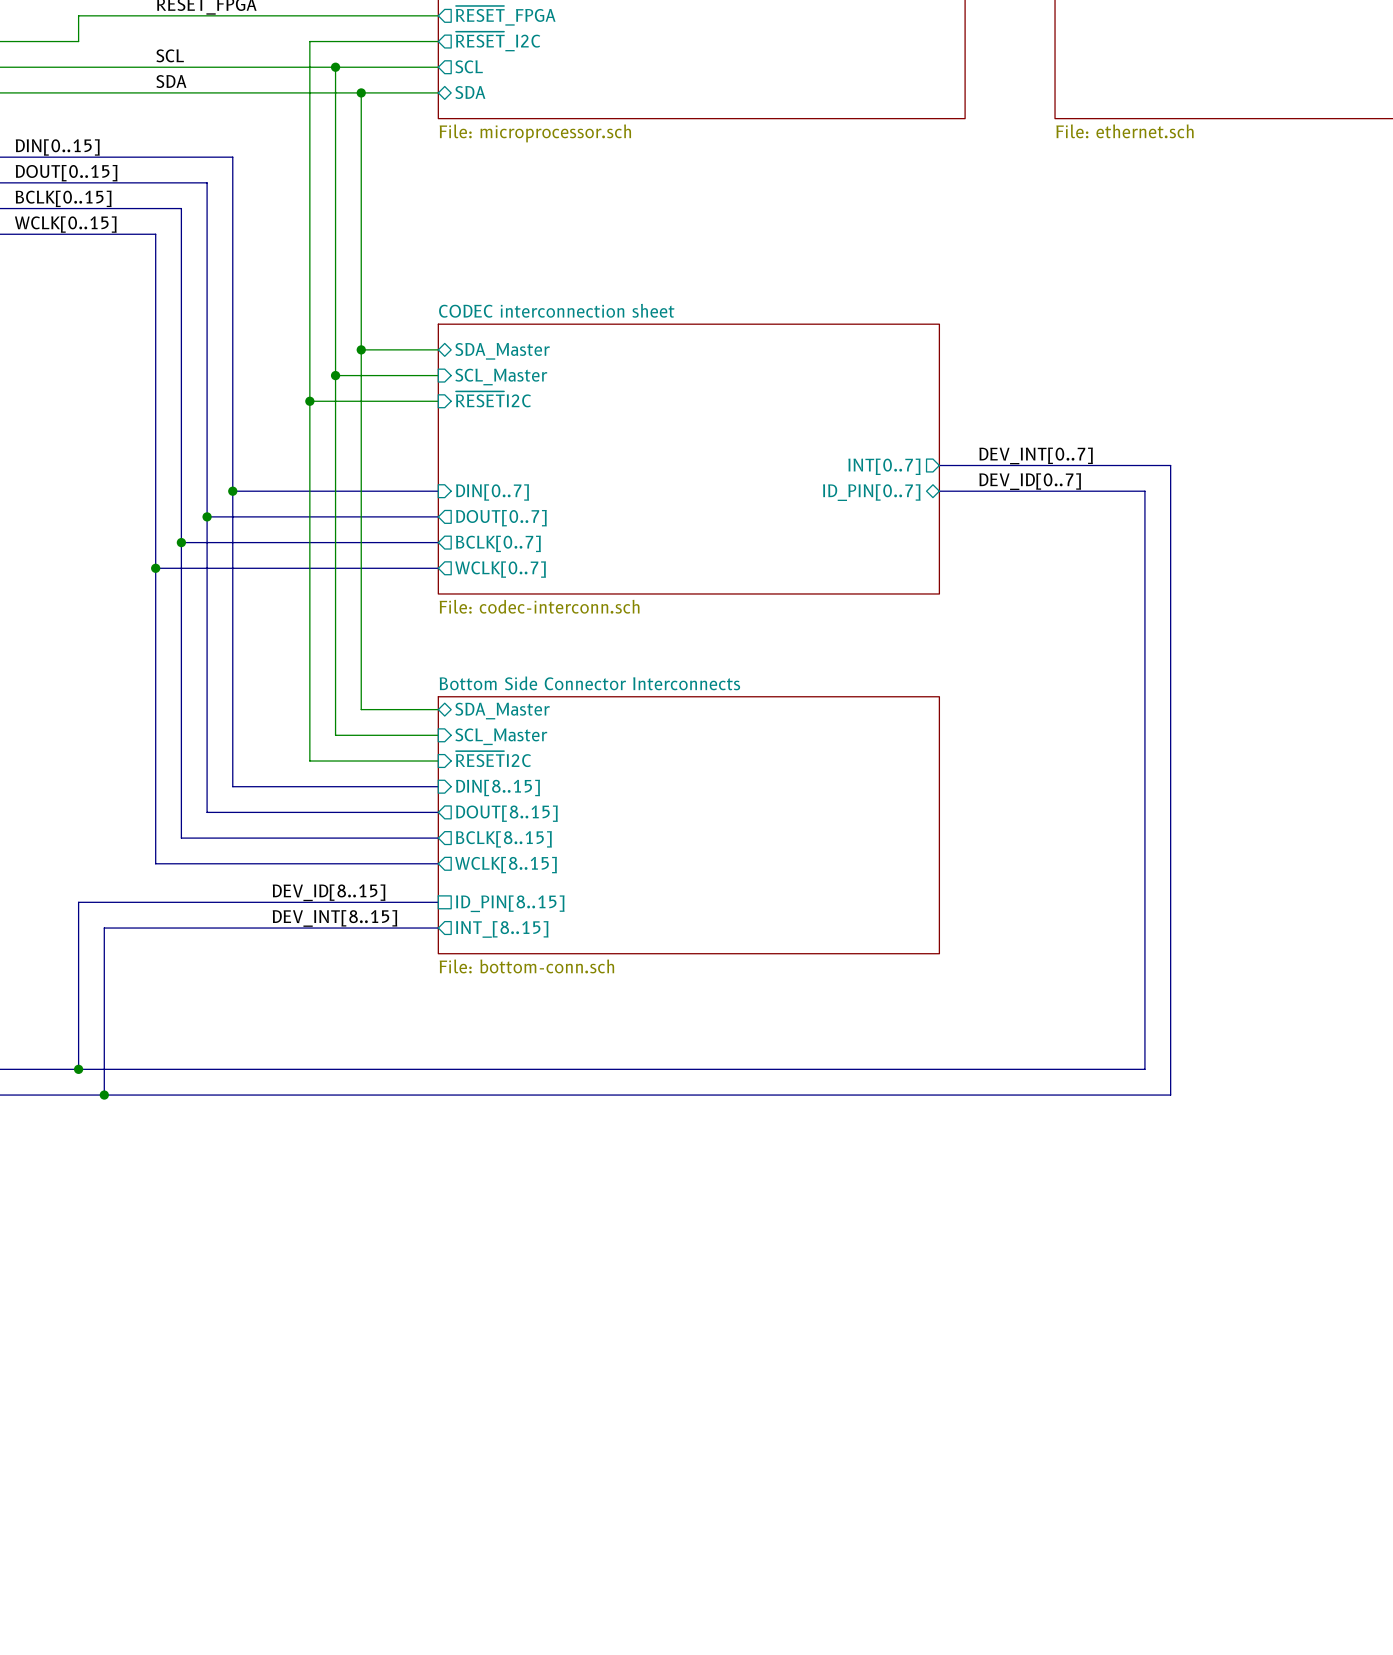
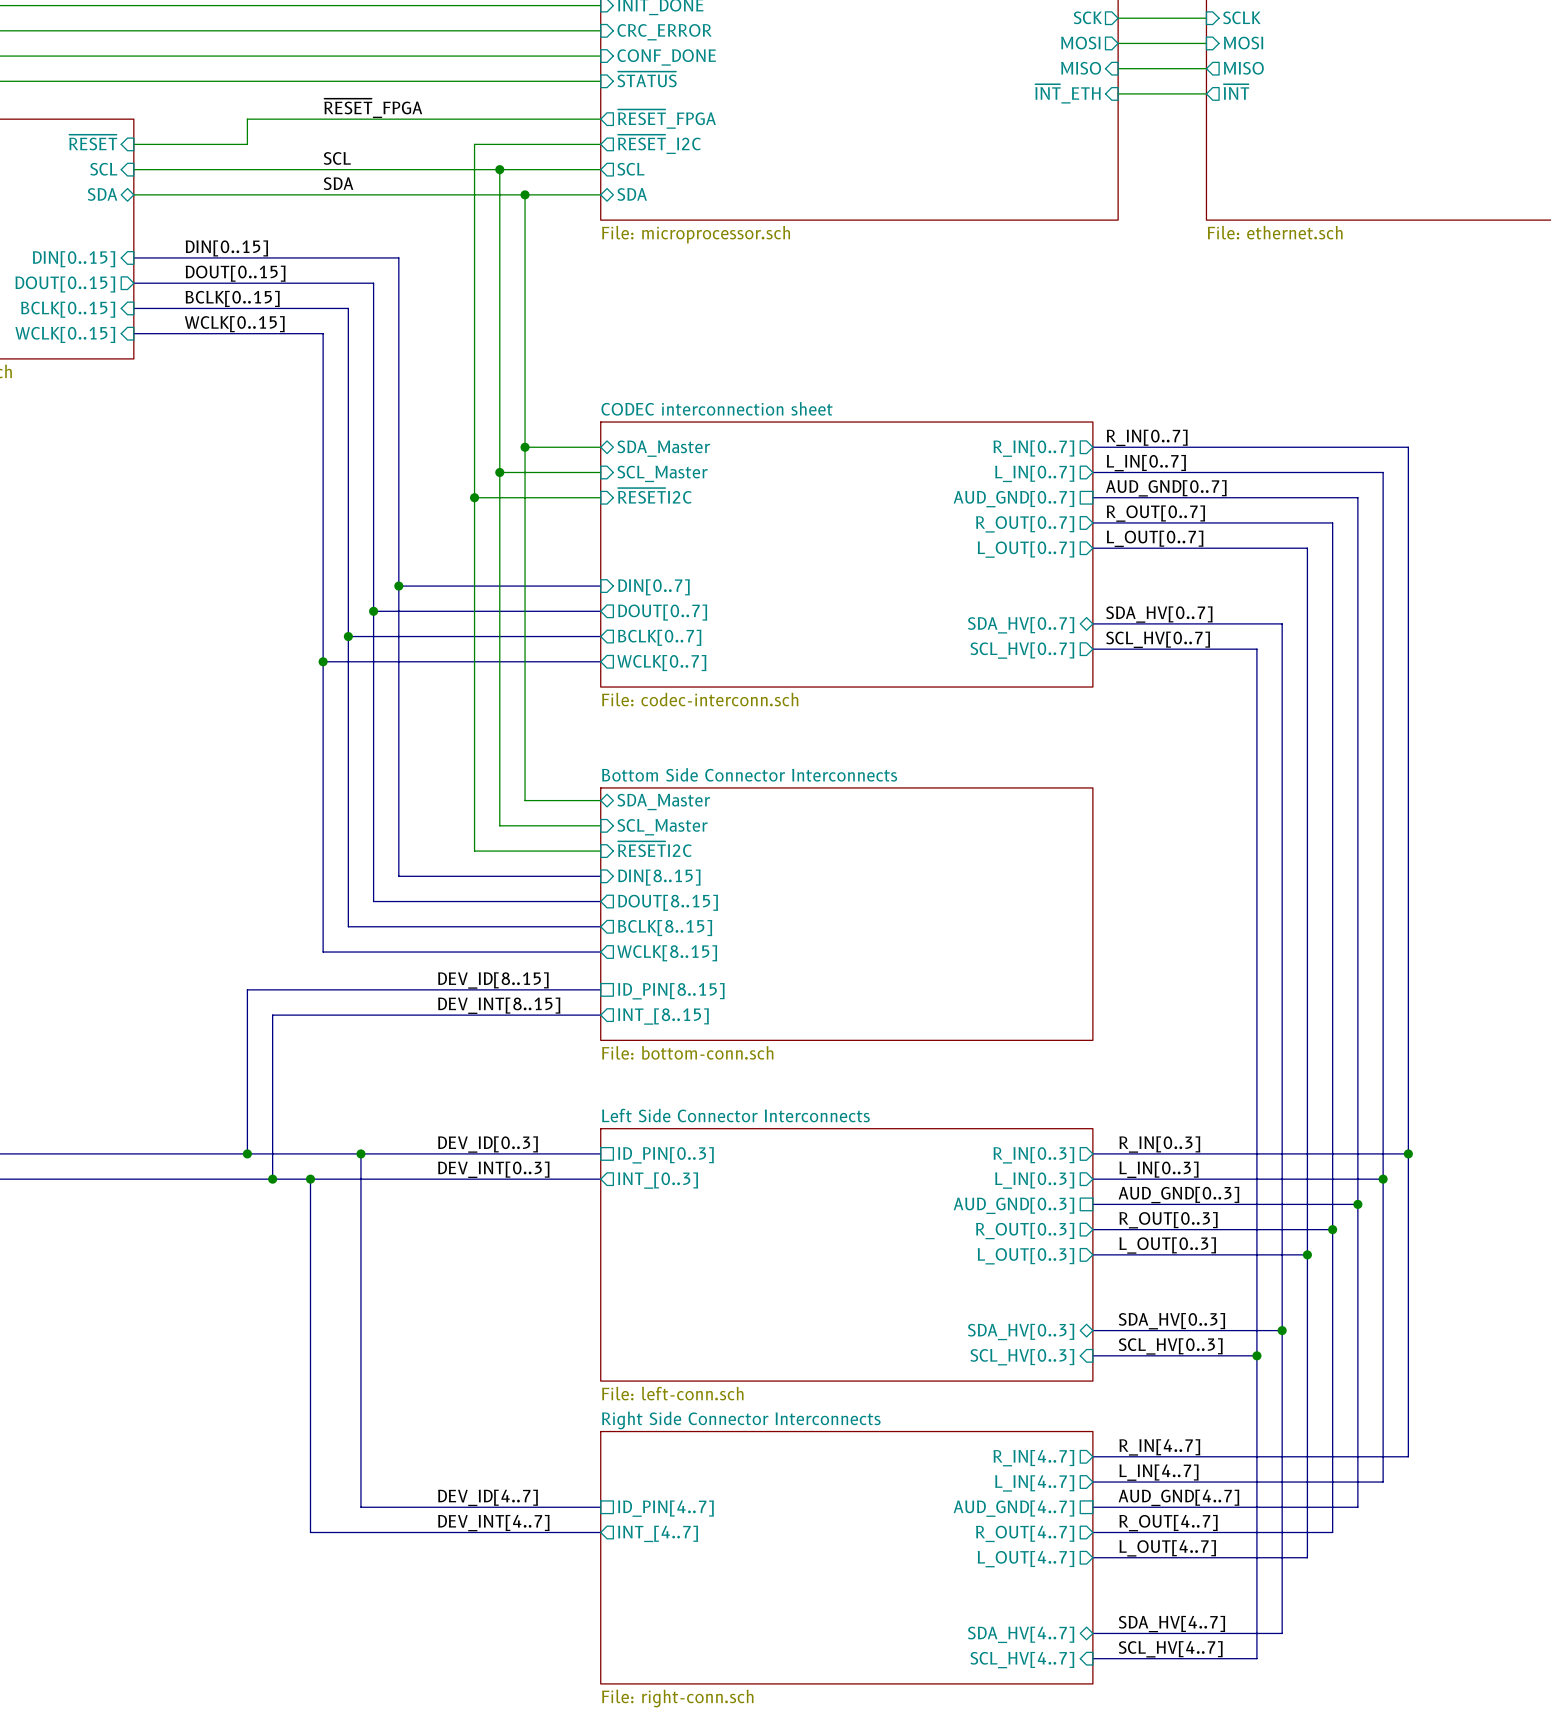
label: none -> R_IN[0..7] (1147, 437)
bus: none -> (1092, 447) (1408, 447) (1408, 1456) (1092, 1456)
sheet pin: none -> R_IN[0..7] (1033, 448)
label: none -> L_IN[0..7] (1146, 463)
bus: none -> (1092, 472) (1383, 472) (1383, 1482) (1092, 1482)
sheet pin: none -> L_IN[0..7] (1034, 473)
label: none -> AUD_GND[0..7] (1166, 488)
bus: none -> (1092, 497) (1357, 497) (1357, 1507) (1092, 1507)
sheet pin: none -> AUD_GND[0..7] (1014, 499)
label: none -> R_OUT[0..7] (1155, 513)
bus: none -> (1092, 522) (1332, 522) (1332, 1532) (1092, 1532)
sheet pin: none -> R_OUT[0..7] (1025, 524)
bus: none -> (1092, 548) (1307, 548) (1307, 1557) (1092, 1557)
label: DEV_INT[0..7] (1036, 455) -> L_OUT[0..7] (1155, 538)
bus: (939, 465) (1170, 465) (1170, 1095) -> (1383, 1179) (1320, 1179)
sheet pin: INT[0..7] (884, 466) -> L_OUT[0..7] (1026, 549)
label: DEV_ID[0..7] (1030, 481) -> none
bus: (939, 491) (1144, 491) (1144, 1069) -> (1408, 1153) (1294, 1153)
sheet pin: ID_PIN[0..7] (871, 492) -> none
label: none -> SDA_HV[0..7] (1159, 614)
bus: none -> (1092, 623) (1282, 623) (1282, 1633) (1092, 1633)
sheet pin: none -> SDA_HV[0..7] (1021, 625)
label: none -> SCL_HV[0..7] (1158, 639)
bus: none -> (1092, 649) (1256, 649) (1256, 1658) (1092, 1658)
sheet pin: none -> SCL_HV[0..7] (1022, 650)
label: none -> DEV_ID[0..3] (488, 1144)
label: none -> R_IN[0..3] (1159, 1144)
bus: none -> (360, 1153) (360, 1507) (600, 1507)
junction: none -> (360, 1153)
bus: (438, 1069) (939, 1069) -> none
junction: none -> (1408, 1153)
sheet pin: none -> ID_PIN[0..3] (665, 1155)
sheet pin: none -> R_IN[0..3] (1033, 1155)
label: none -> DEV_INT[0..3] (493, 1169)
label: none -> L_IN[0..3] (1159, 1169)
bus: none -> (310, 1179) (310, 1532) (600, 1532)
junction: none -> (310, 1179)
bus: (438, 1095) (939, 1095) -> none
junction: none -> (1383, 1179)
sheet pin: none -> INT_[0..3] (658, 1180)
sheet pin: none -> L_IN[0..3] (1034, 1180)
label: none -> AUD_GND[0..3] (1178, 1195)
bus: none -> (1092, 1204) (1357, 1204)
junction: none -> (1357, 1204)
sheet pin: none -> AUD_GND[0..3] (1014, 1205)
label: none -> R_OUT[0..3] (1168, 1220)
bus: none -> (1092, 1229) (1332, 1229)
junction: none -> (1332, 1229)
sheet pin: none -> R_OUT[0..3] (1025, 1231)
label: none -> L_OUT[0..3] (1167, 1245)
sheet Left Side Connector Interconnects: none -> File: left-conn.sch (846, 1254)
bus: none -> (1092, 1254) (1307, 1254)
junction: none -> (1307, 1254)
sheet pin: none -> L_OUT[0..3] (1026, 1256)
label: none -> SDA_HV[0..3] (1172, 1321)
bus: none -> (1092, 1330) (1282, 1330)
junction: none -> (1282, 1330)
sheet pin: none -> SDA_HV[0..3] (1021, 1332)
label: none -> SCL_HV[0..3] (1170, 1346)
bus: none -> (1092, 1355) (1256, 1355)
junction: none -> (1256, 1355)
sheet pin: none -> SCL_HV[0..3] (1022, 1357)
label: none -> R_IN[4..7] (1159, 1447)
sheet pin: none -> R_IN[4..7] (1033, 1458)
label: none -> L_IN[4..7] (1159, 1472)
sheet pin: none -> L_IN[4..7] (1034, 1483)
label: none -> DEV_ID[4..7] (488, 1497)
label: none -> AUD_GND[4..7] (1178, 1497)
sheet pin: none -> ID_PIN[4..7] (665, 1508)
sheet pin: none -> AUD_GND[4..7] (1014, 1508)
label: none -> DEV_INT[4..7] (493, 1523)
label: none -> R_OUT[4..7] (1168, 1523)
sheet pin: none -> INT_[4..7] (658, 1533)
sheet pin: none -> R_OUT[4..7] (1025, 1533)
label: none -> L_OUT[4..7] (1167, 1548)
sheet Right Side Connector Interconnects: none -> File: right-conn.sch (846, 1557)
sheet pin: none -> L_OUT[4..7] (1026, 1559)
label: none -> SDA_HV[4..7] (1172, 1624)
sheet pin: none -> SDA_HV[4..7] (1021, 1634)
label: none -> SCL_HV[4..7] (1170, 1649)
sheet pin: none -> SCL_HV[4..7] (1022, 1660)

